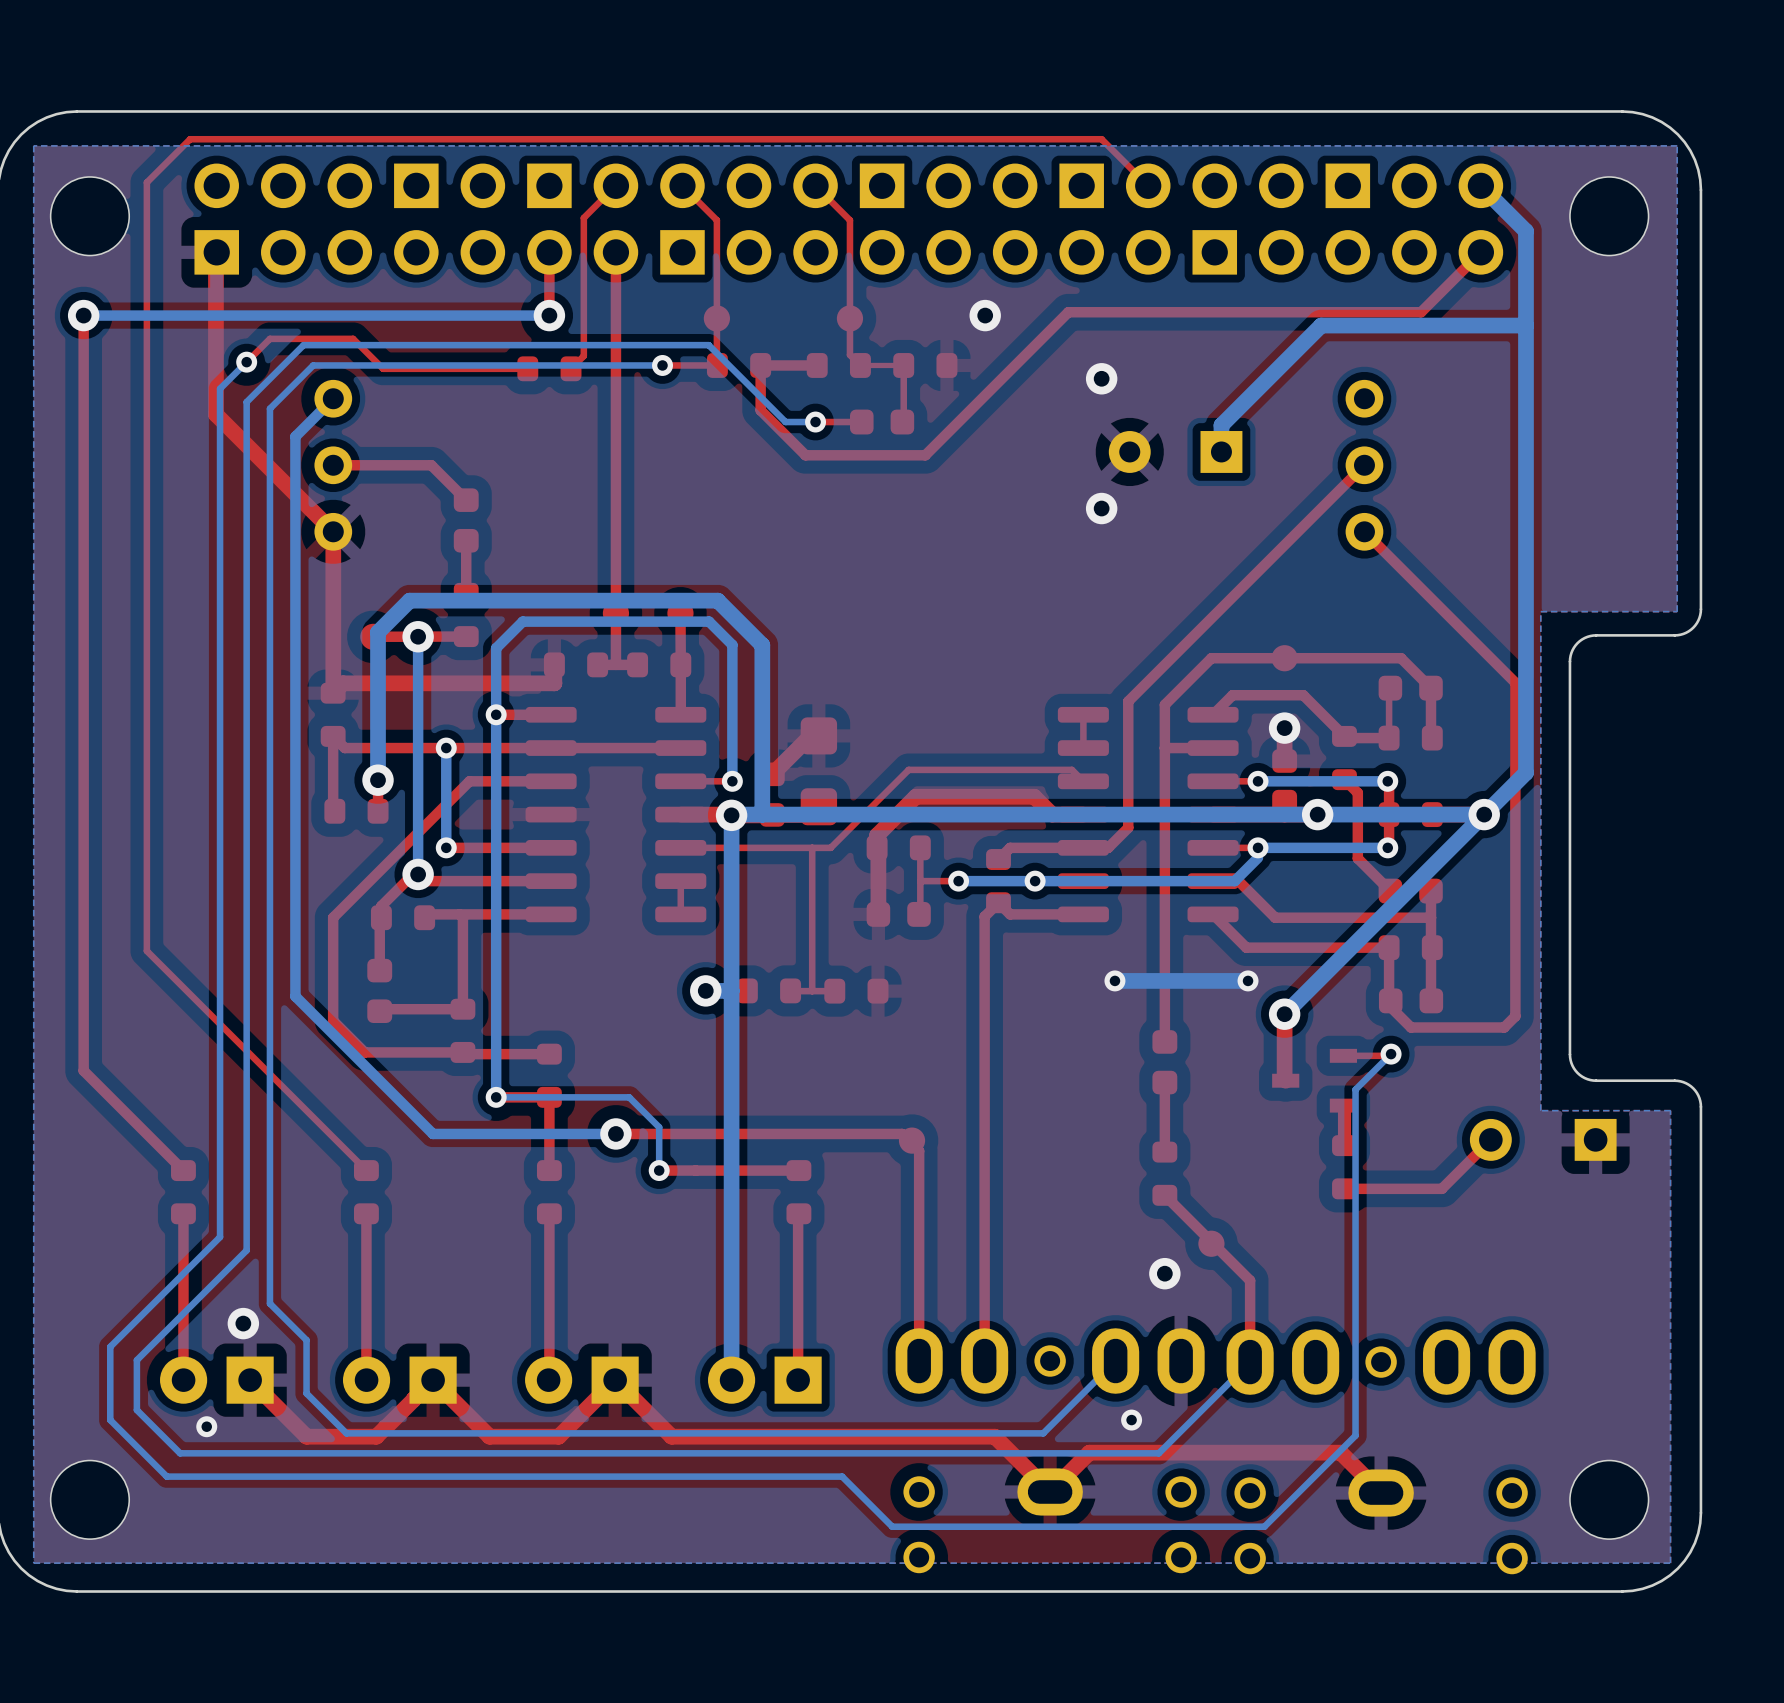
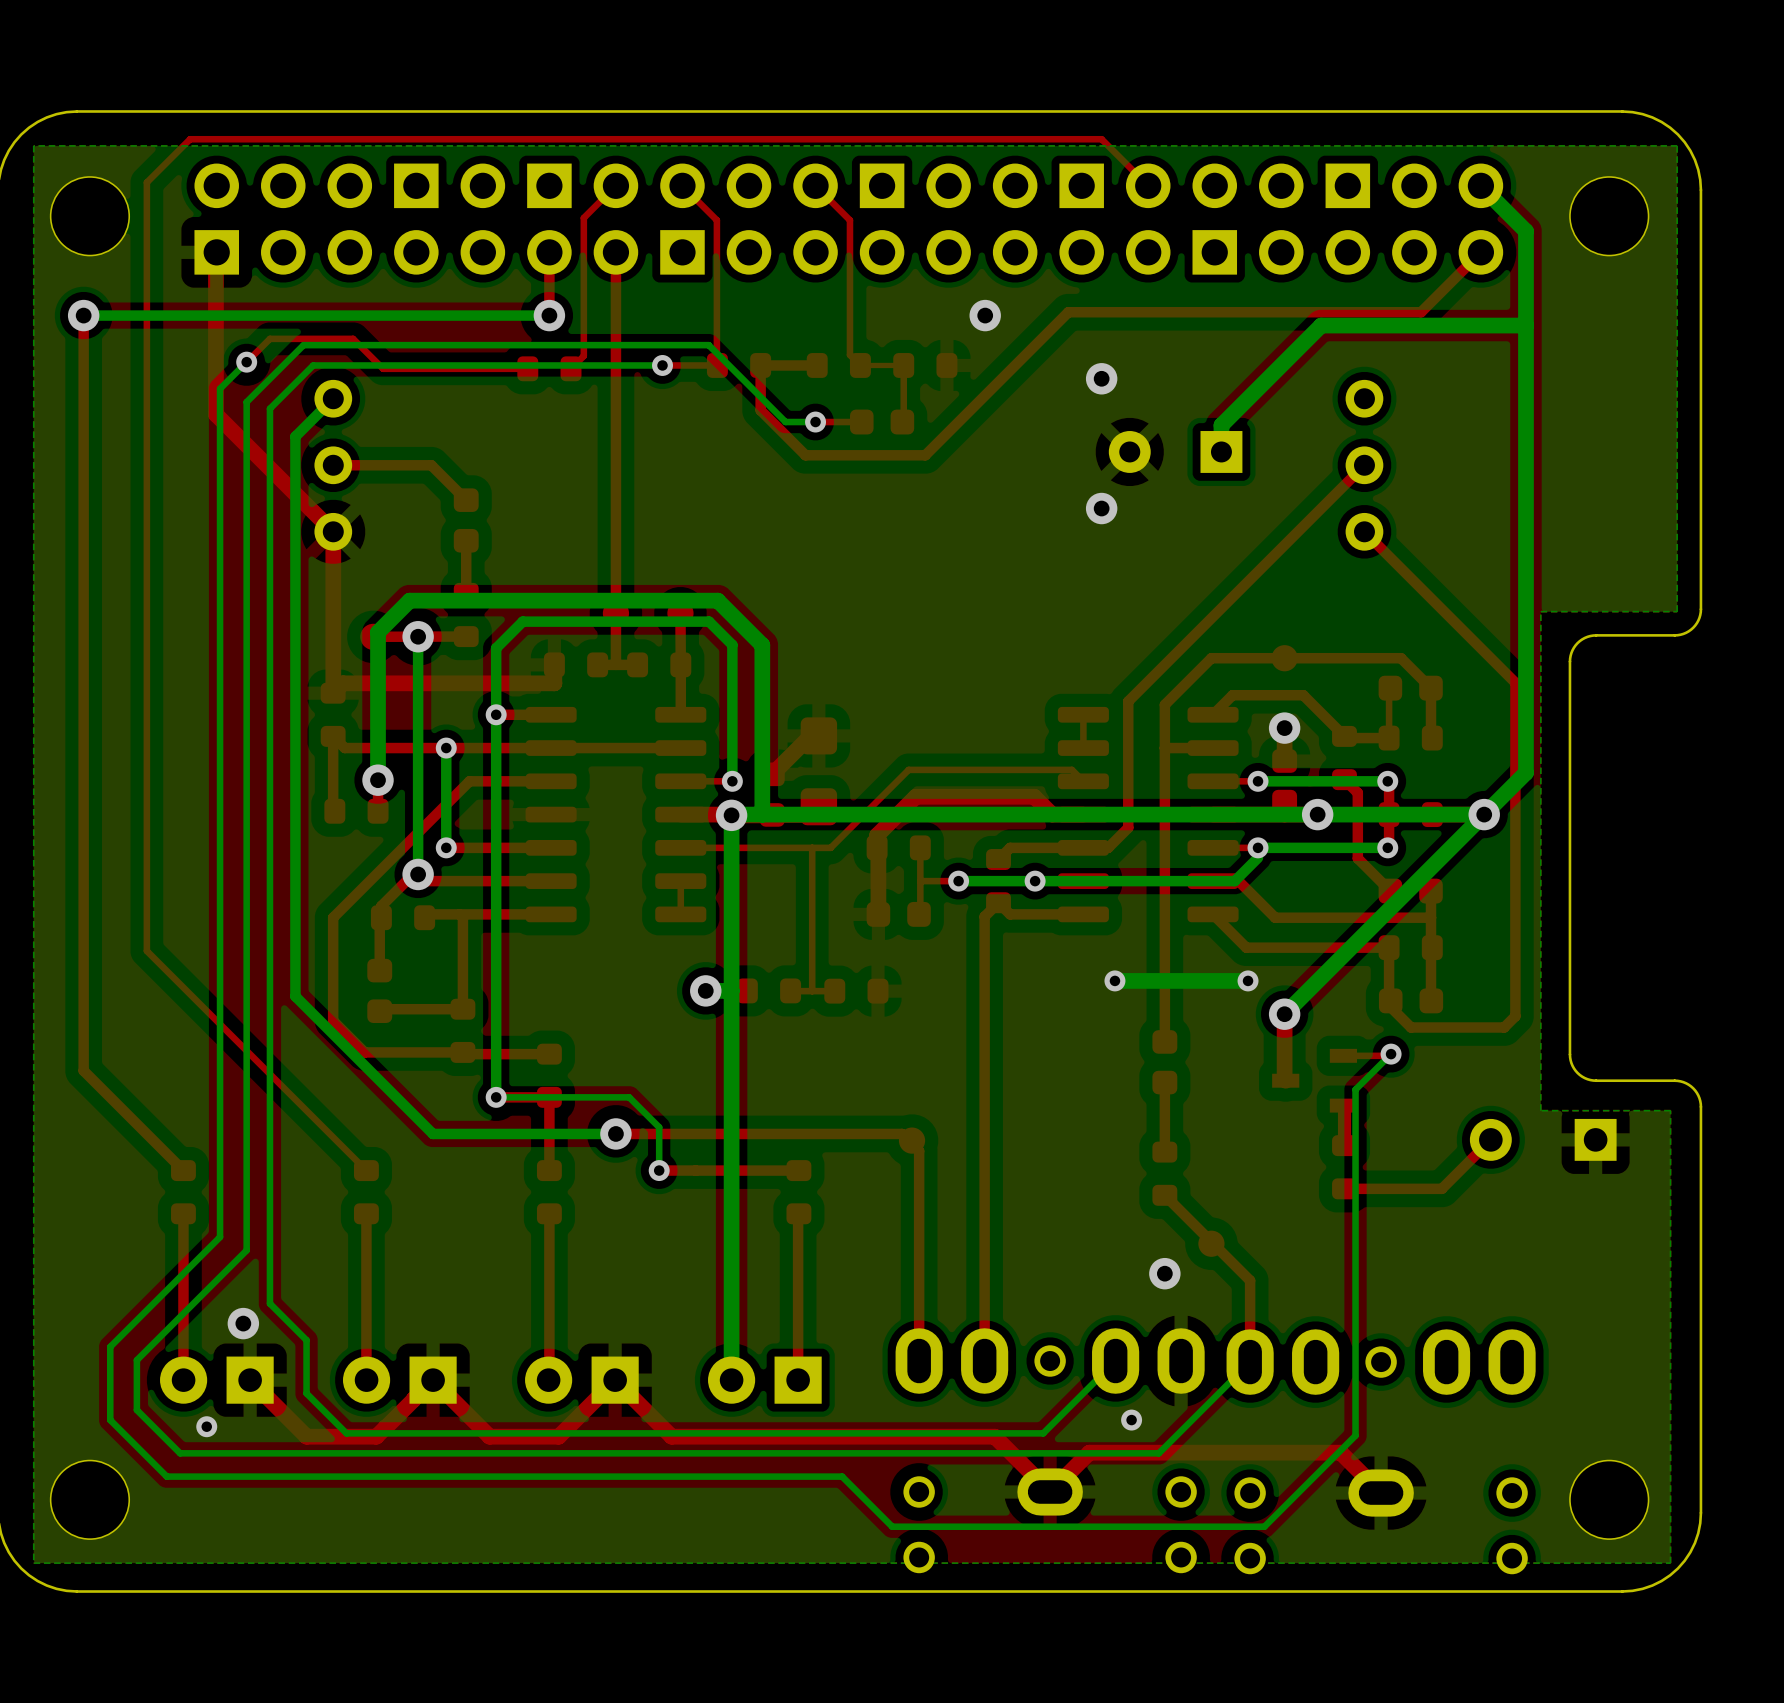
part: (716, 318) -> none
part: (849, 318) -> none

